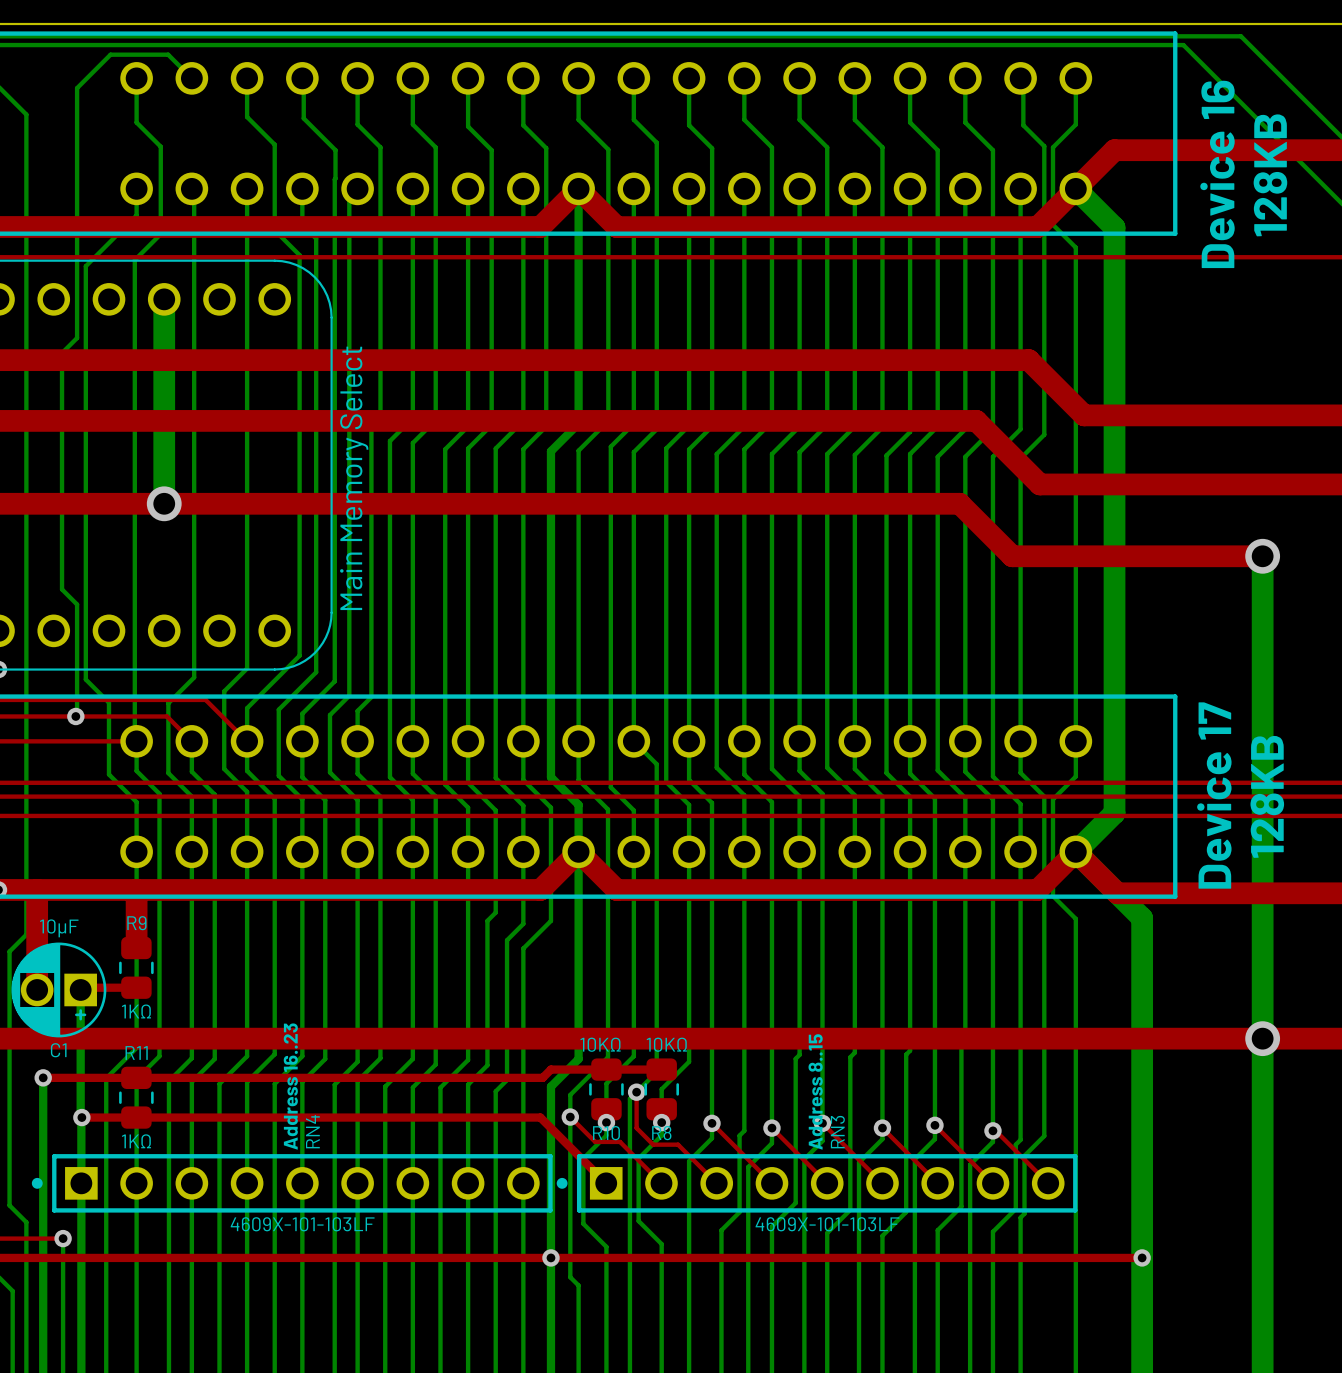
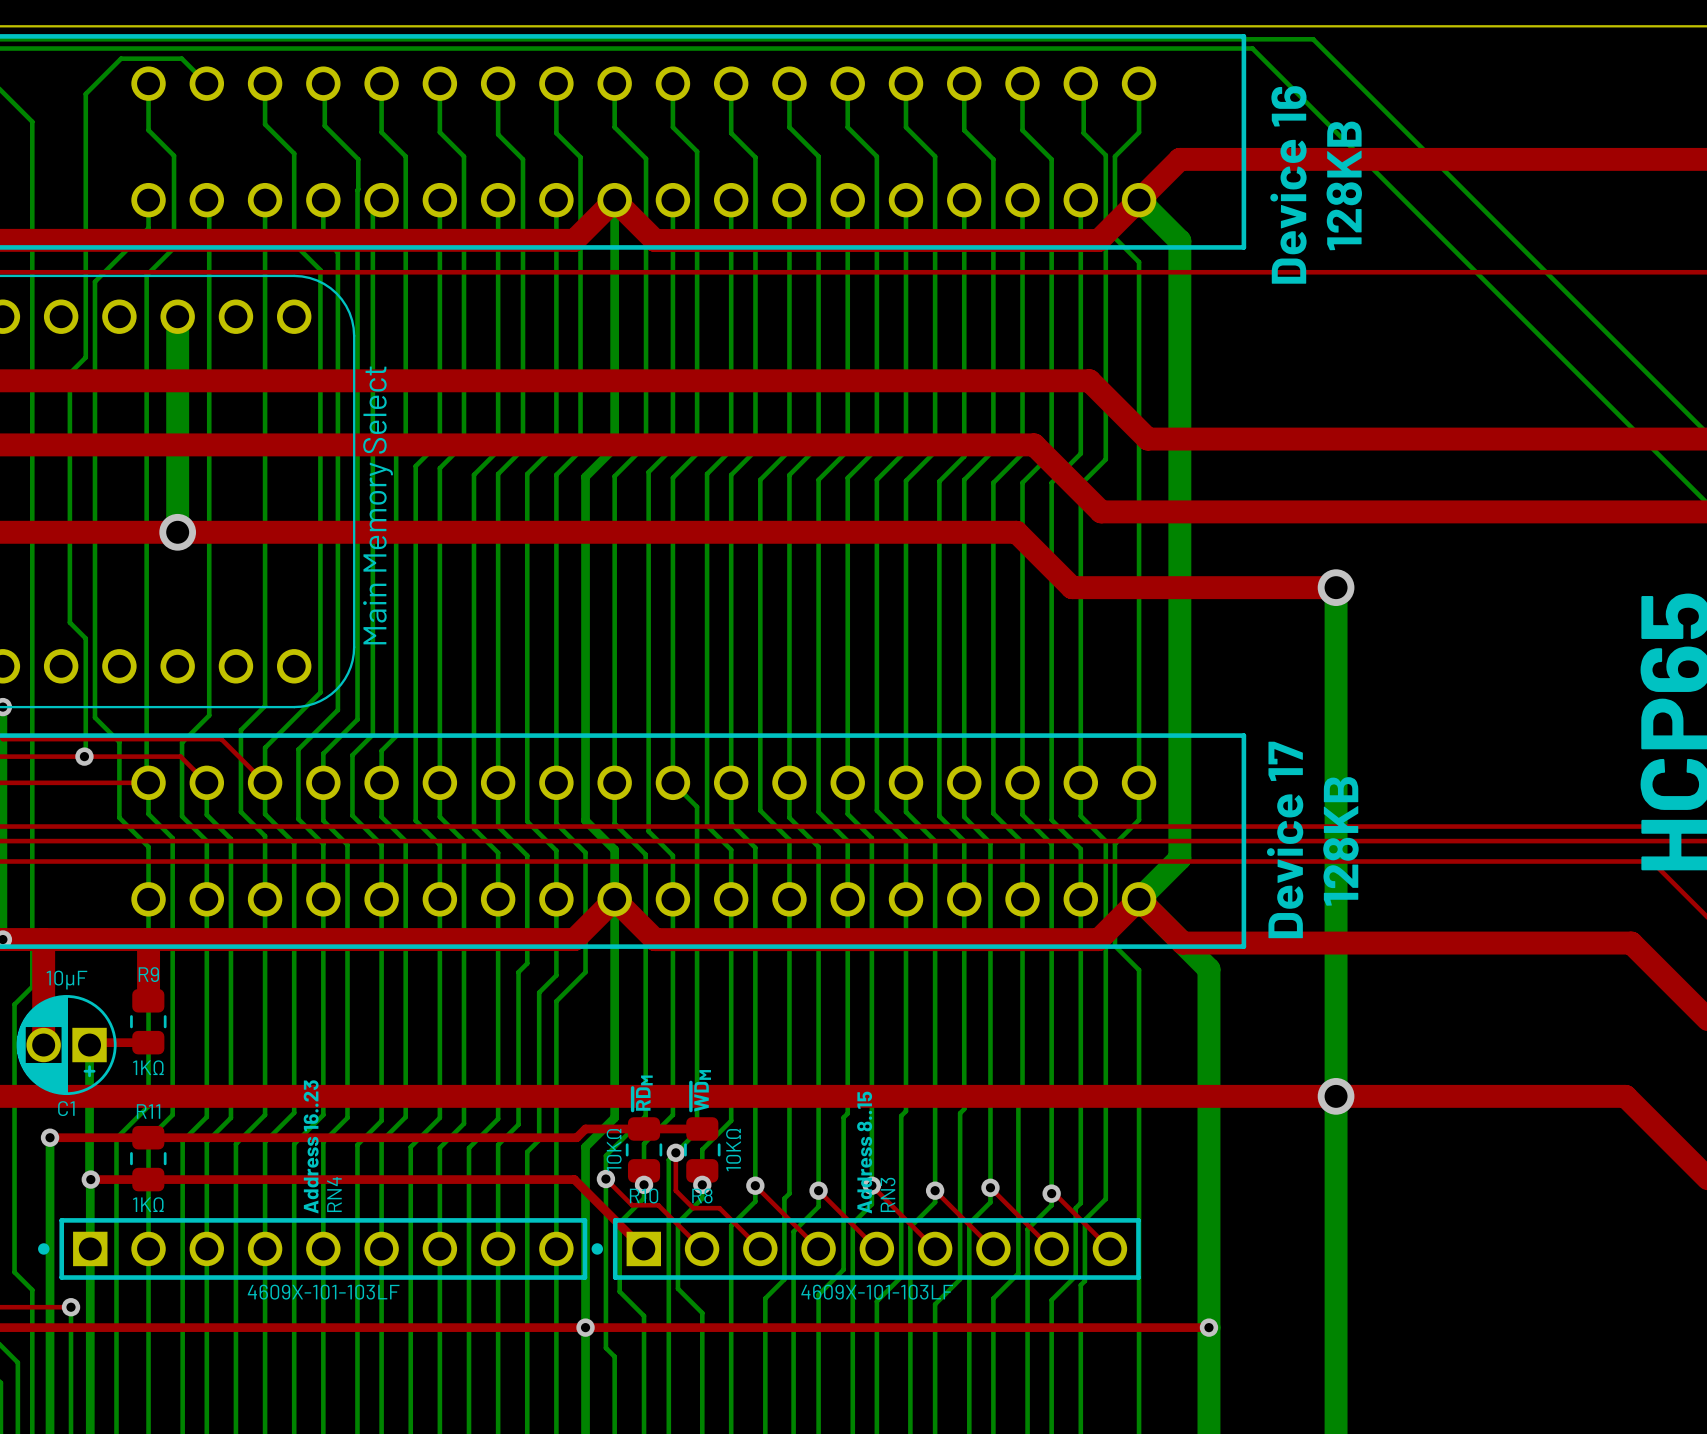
text: none -> ~{WD}M (700, 1090)
text: none -> ~{RD}M (642, 1093)
R10 value rotation: 0° (600, 1044) -> 90° counterclockwise (614, 1150)
R8 value rotation: 0° (666, 1044) -> 90° counterclockwise (733, 1150)

